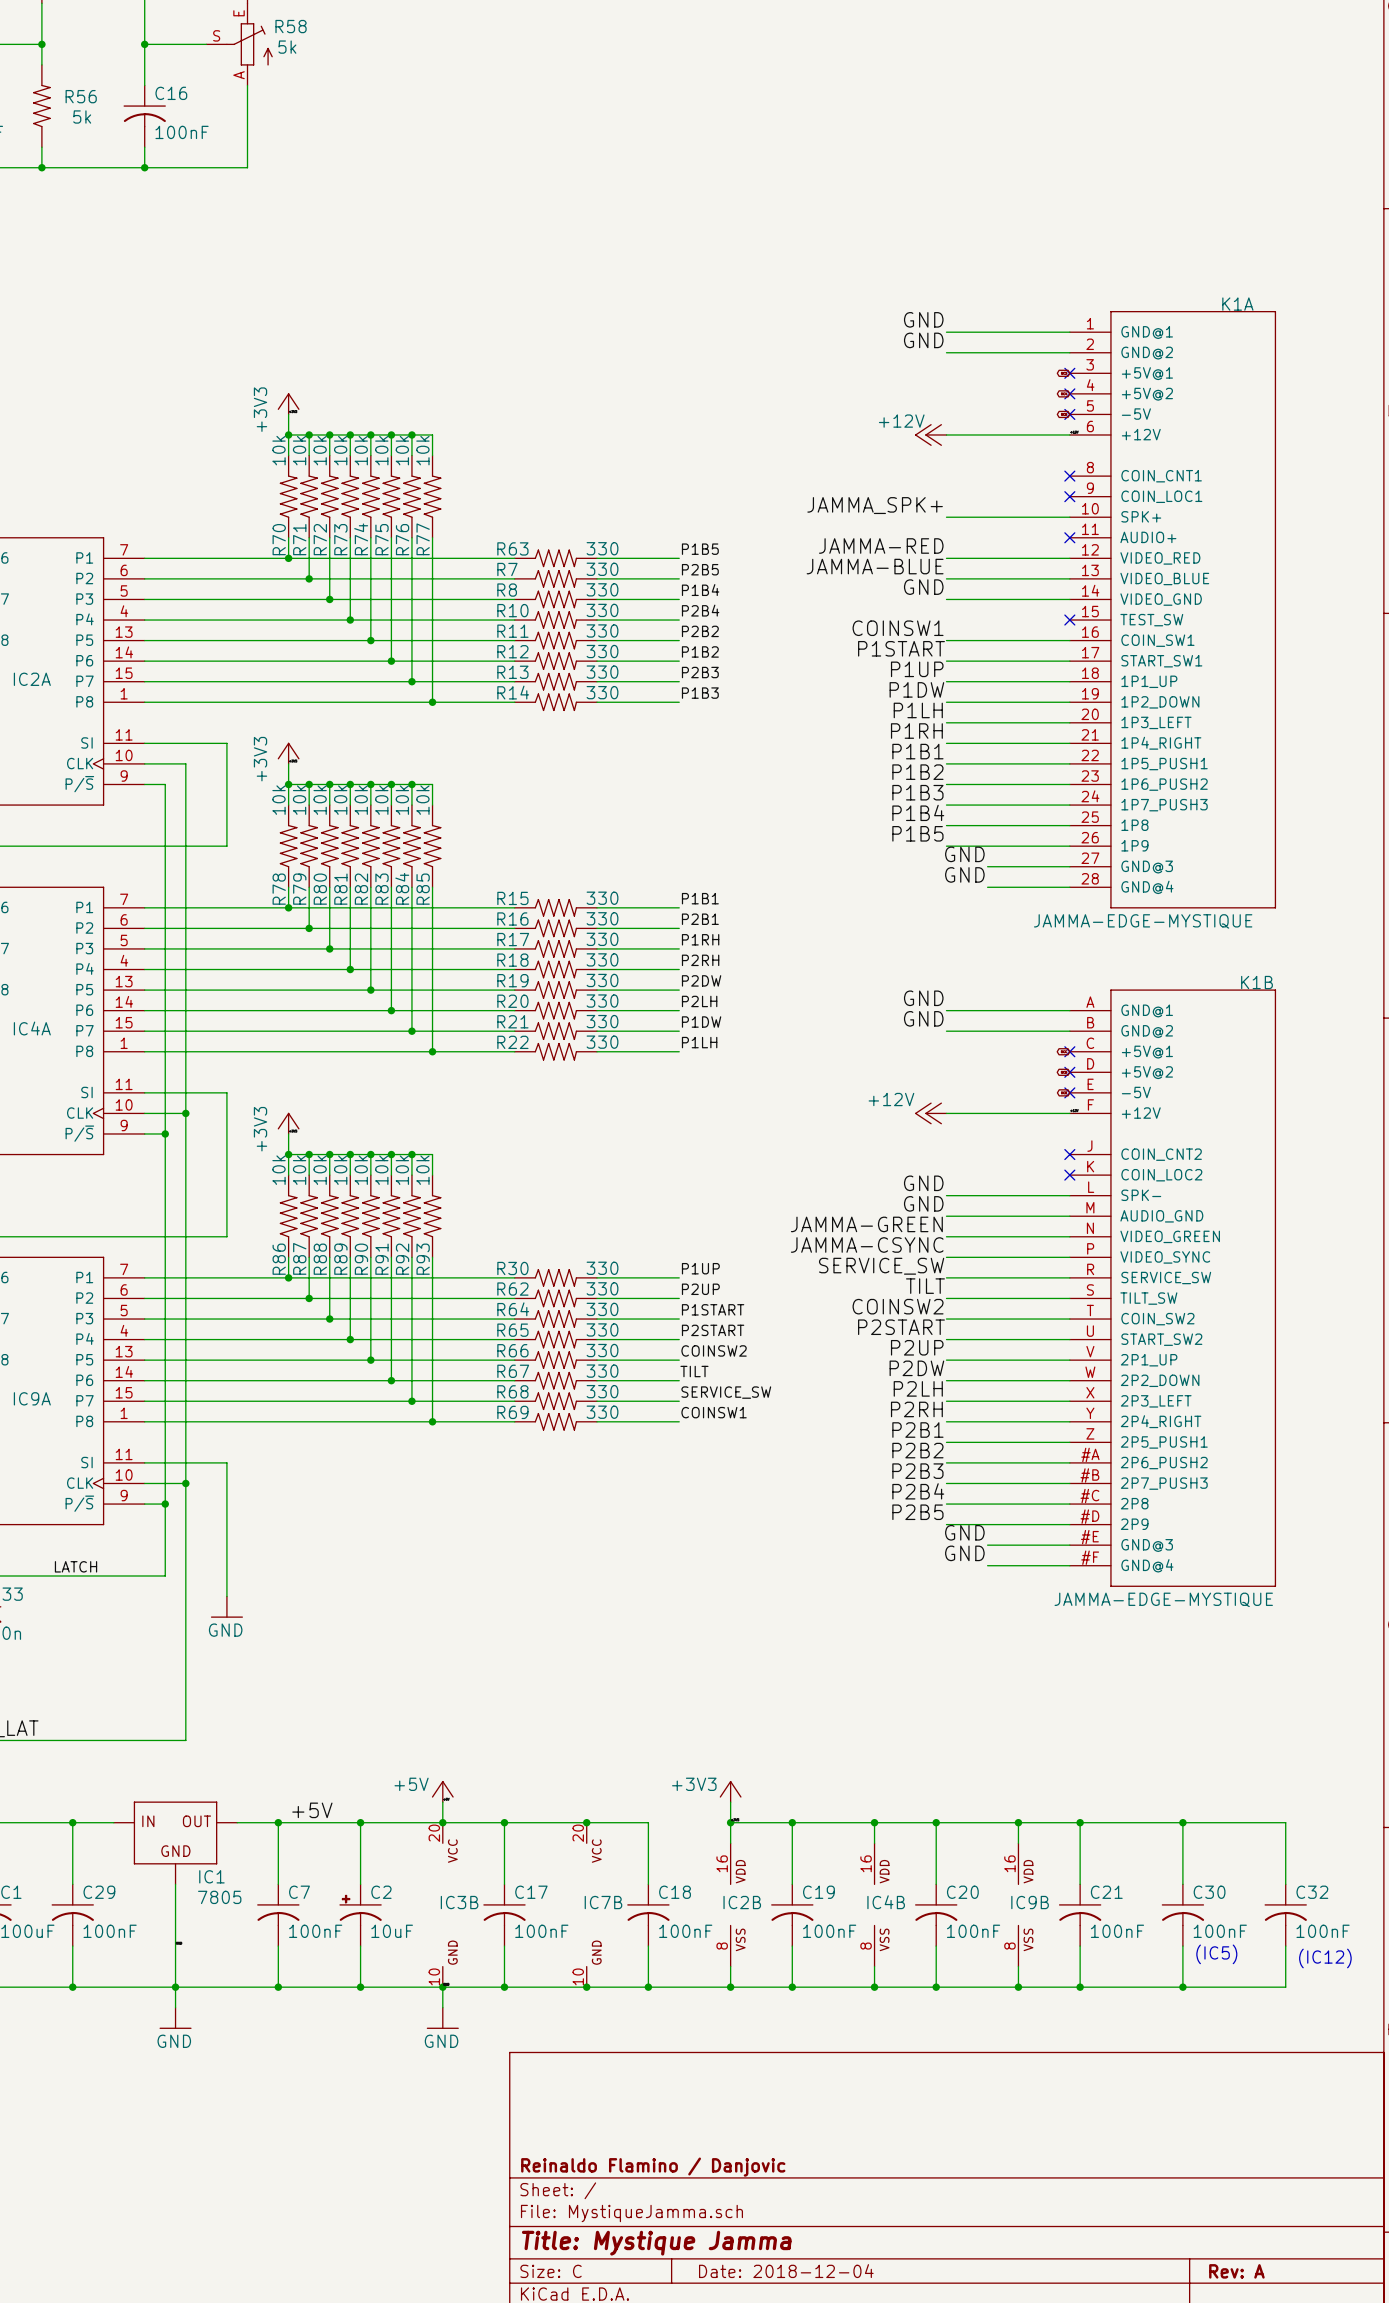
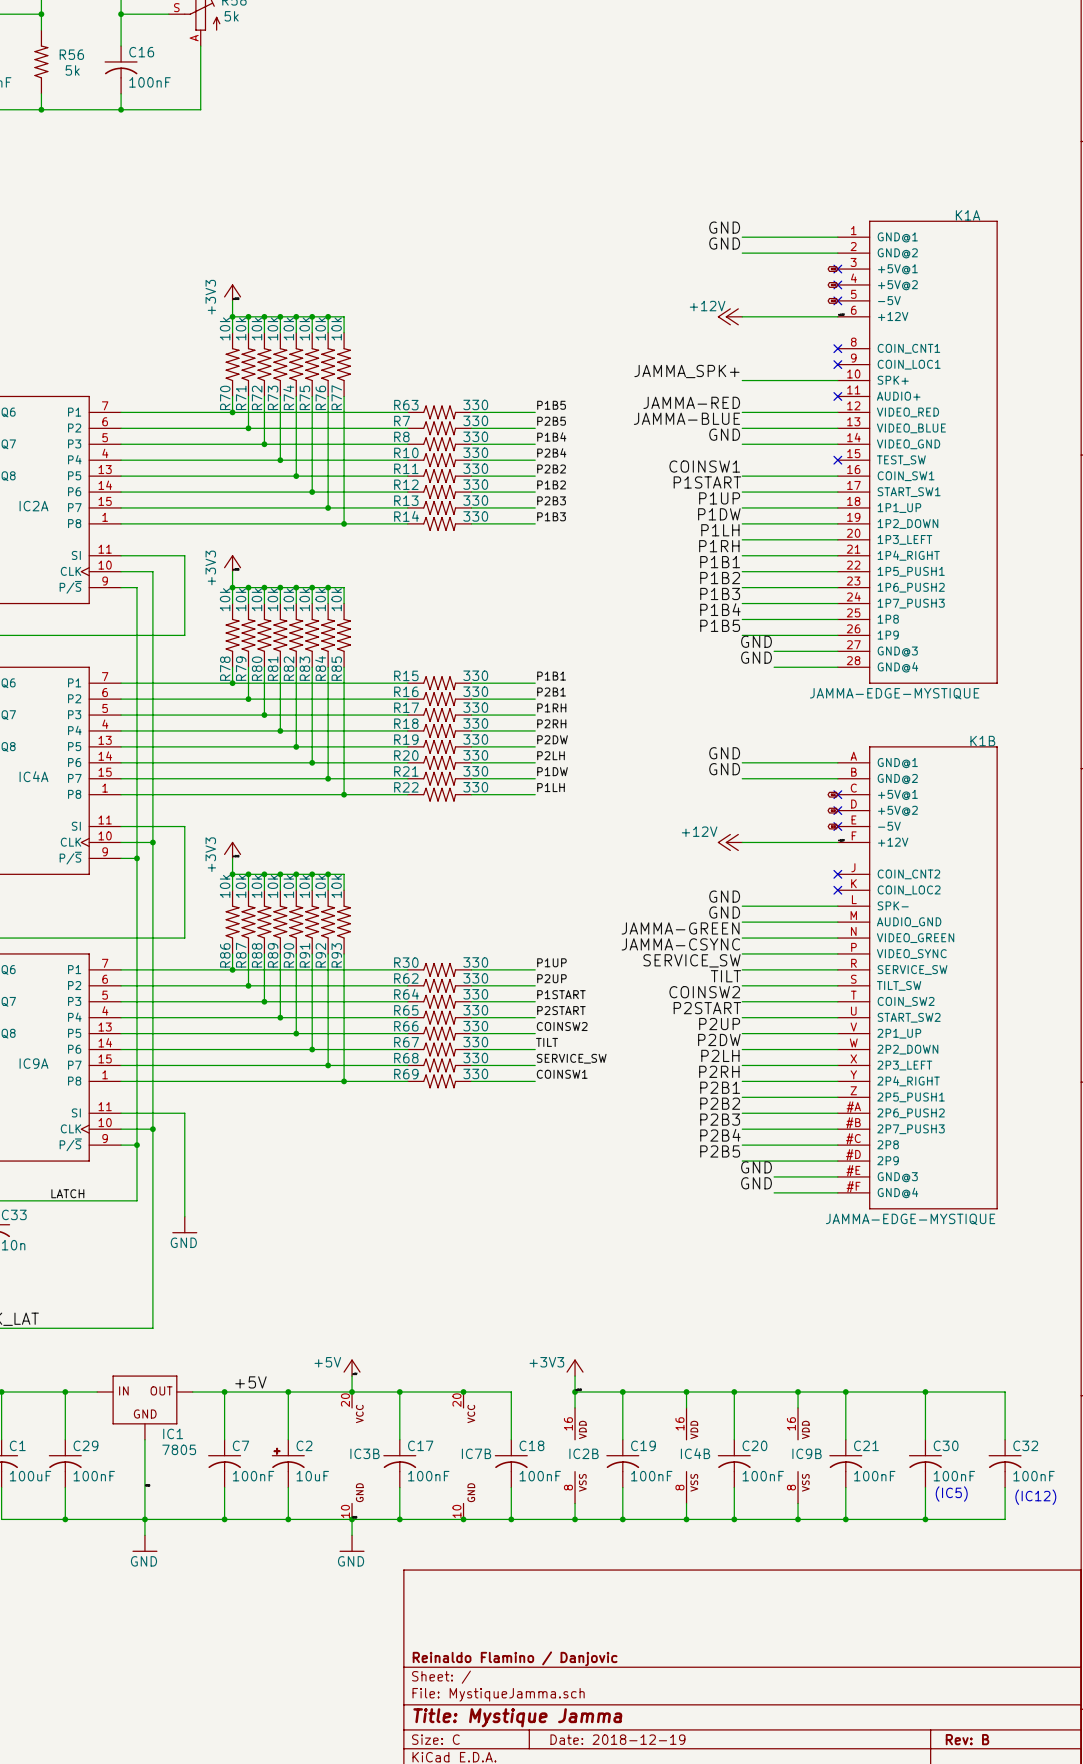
title block: Date: 2018-12-04 (786, 2271) -> Date: 2018-12-19 (617, 1739)
title block: Rev: A (1236, 2271) -> Rev: B (967, 1739)

